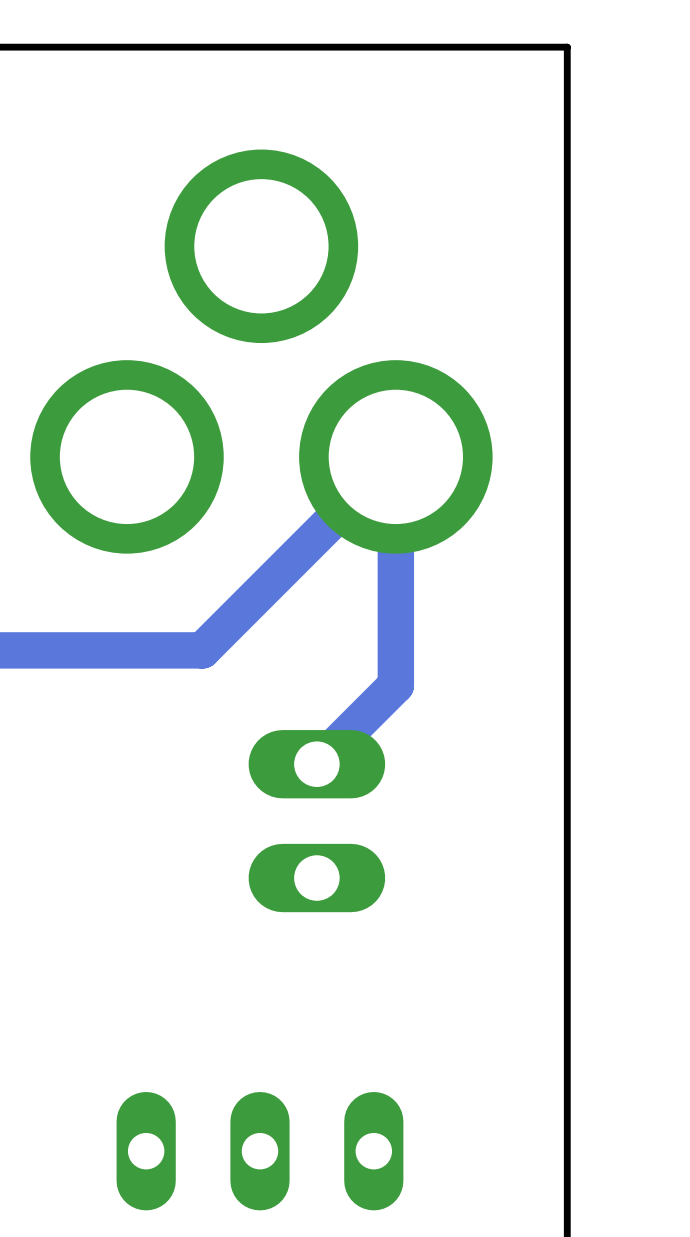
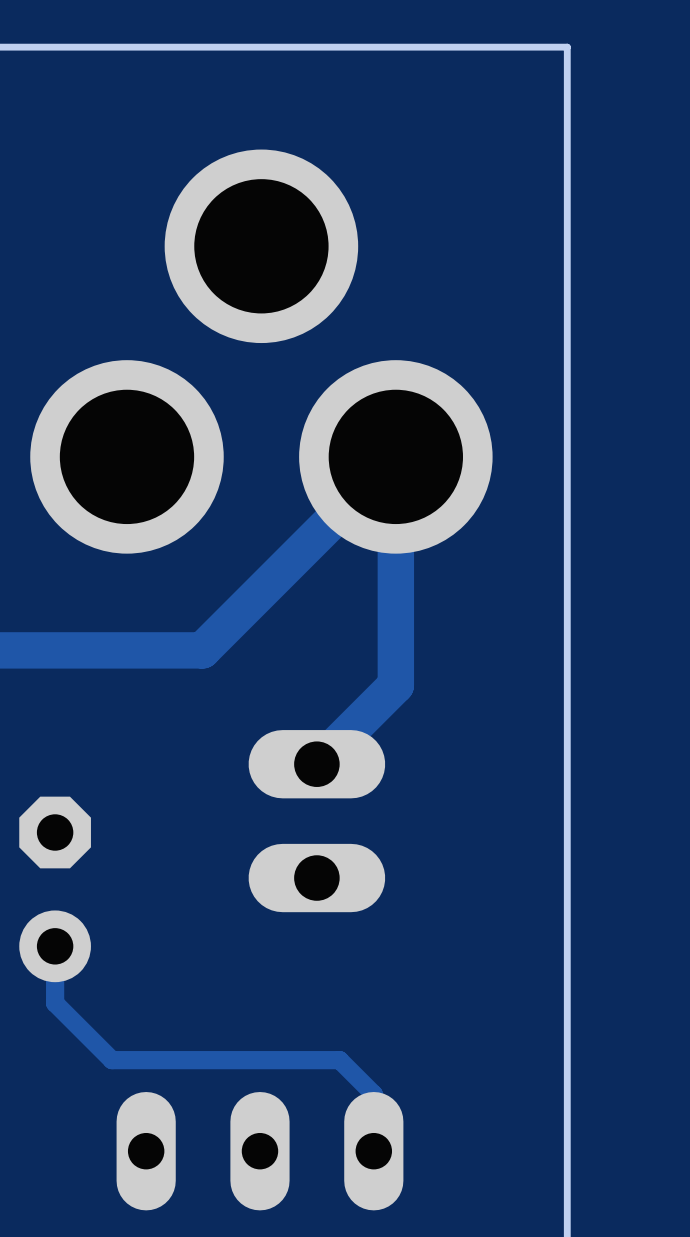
part: none -> (55, 889)
track: none -> (55, 946) (55, 1003) (112, 1060) (339, 1060) (373, 1094) (373, 1151)

